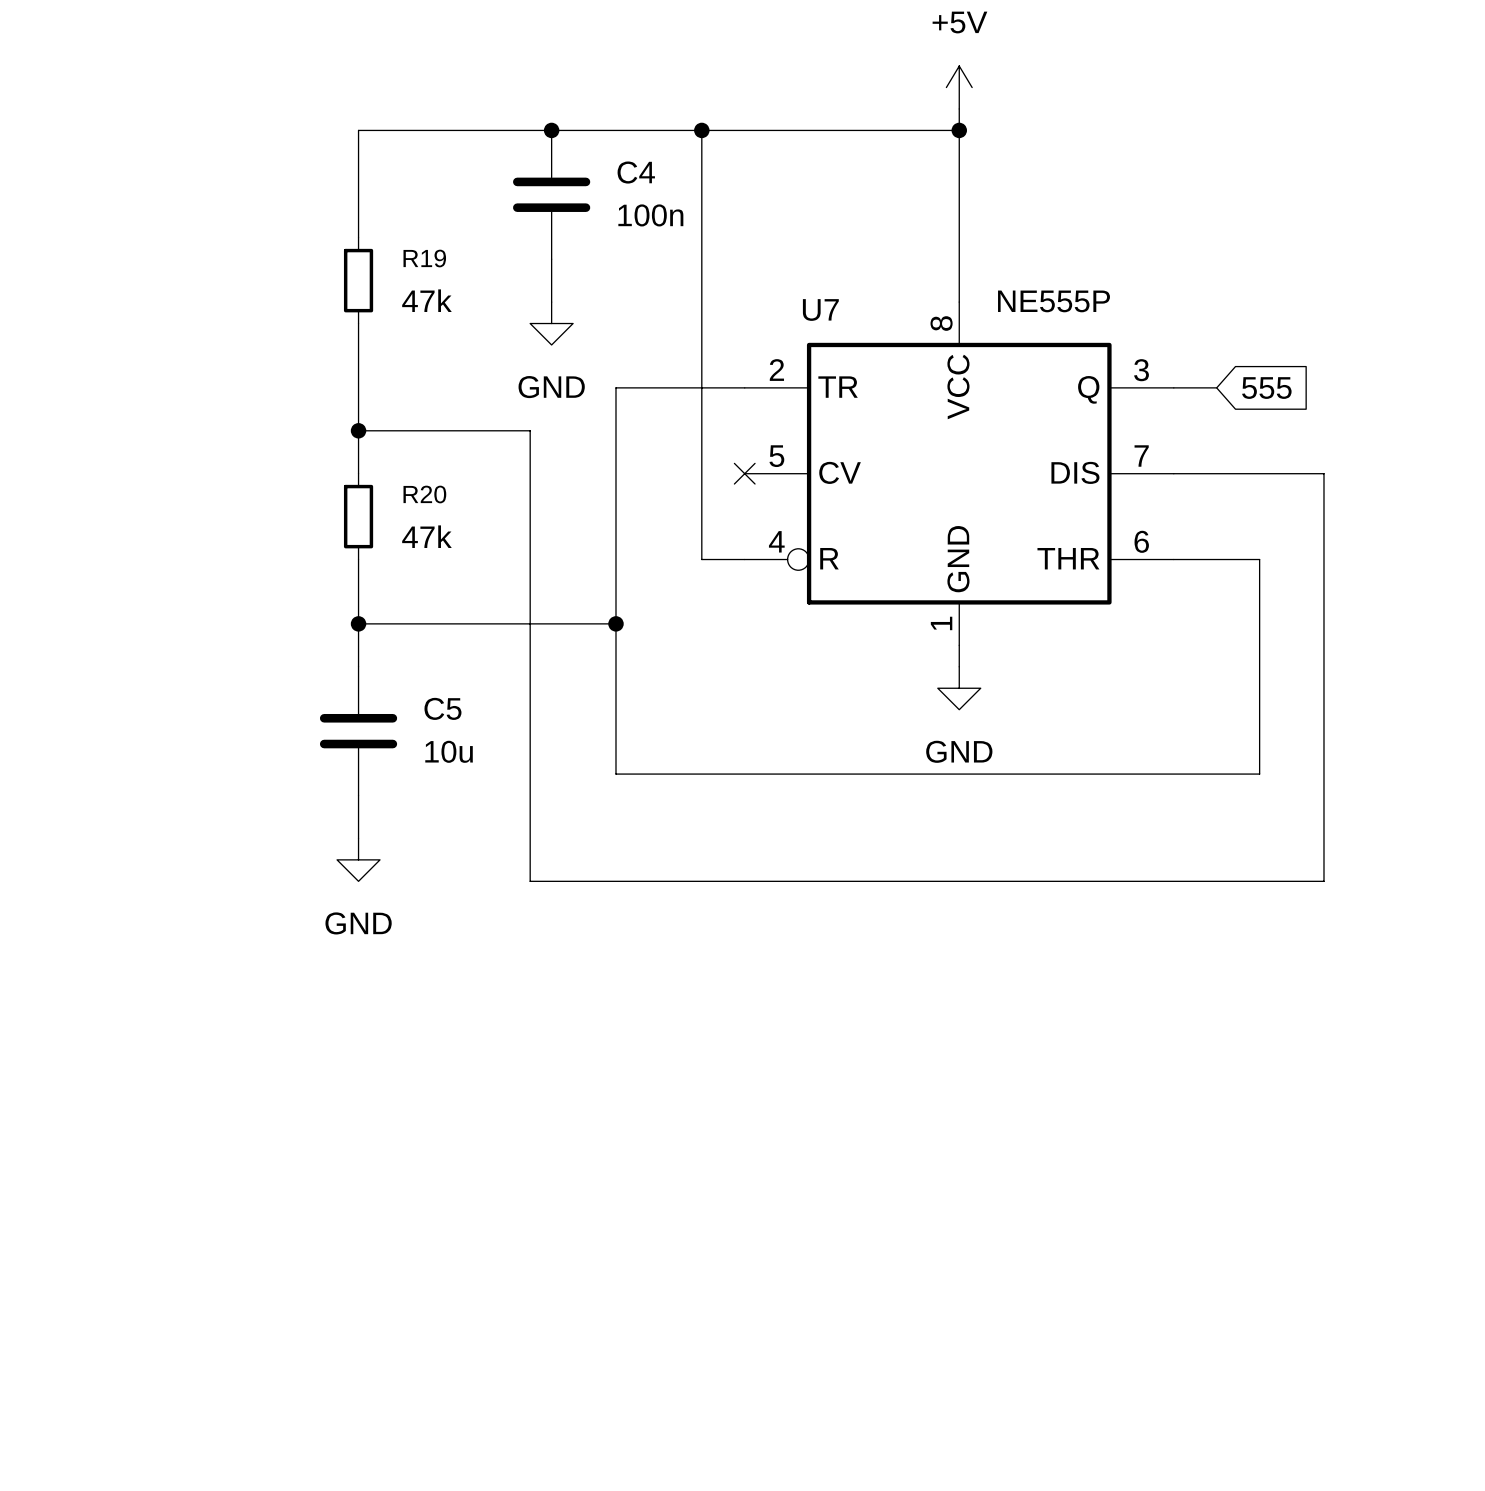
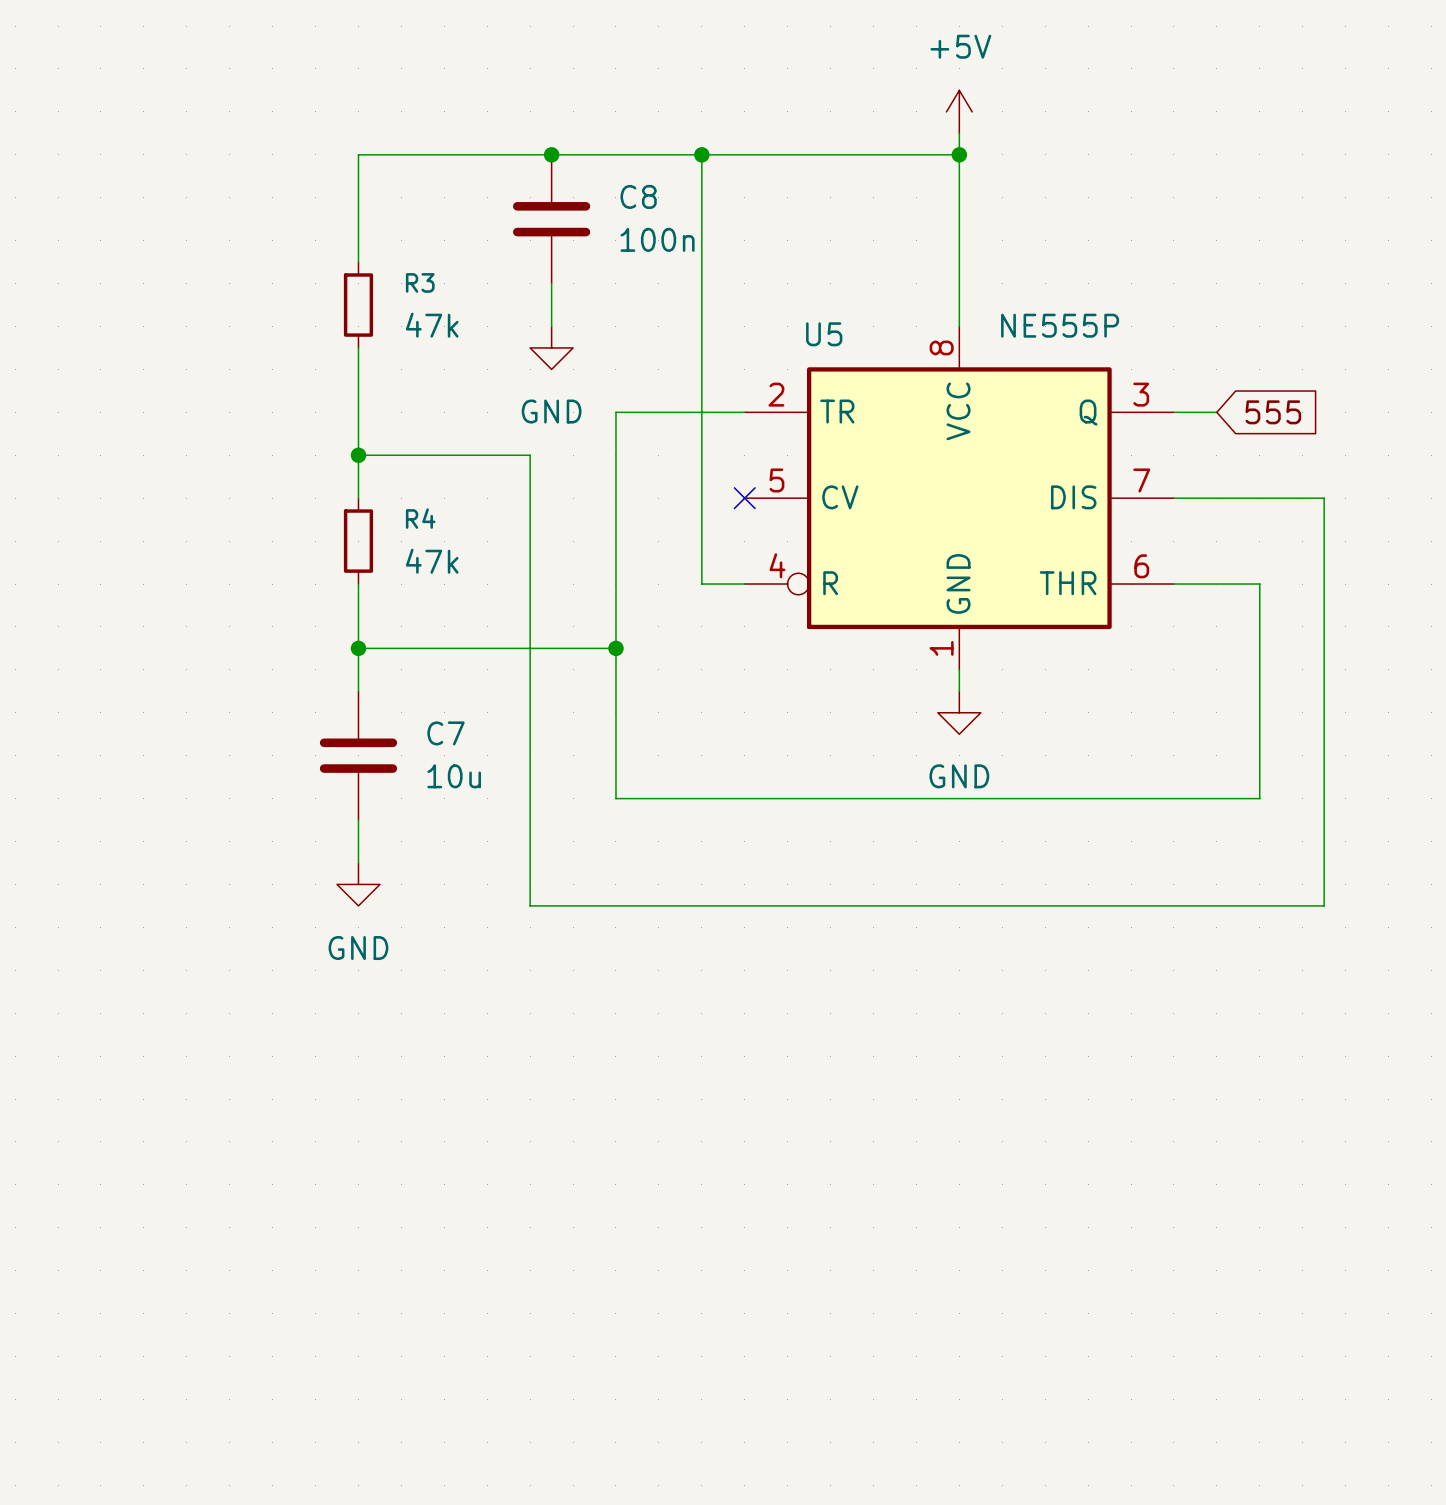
C4 name: C4 (636, 172) -> C8 (638, 196)
R19 name: R19 (424, 258) -> R3 (420, 282)
U7 name: U7 (820, 310) -> U5 (824, 334)
R20 name: R20 (424, 494) -> R4 (420, 518)
C5 name: C5 (442, 708) -> C7 (446, 733)

